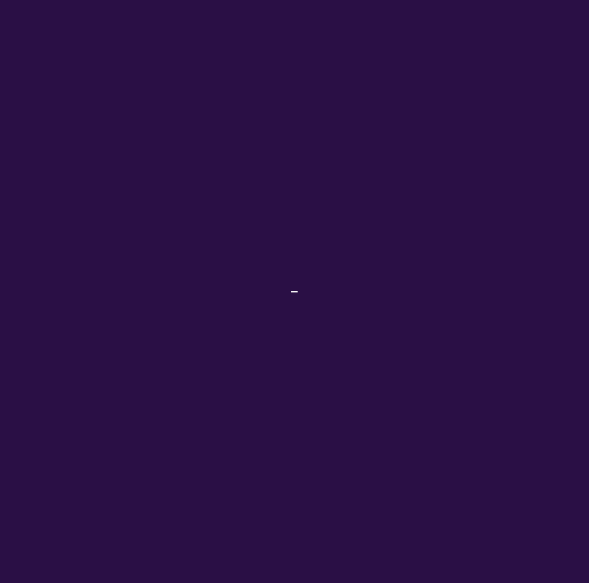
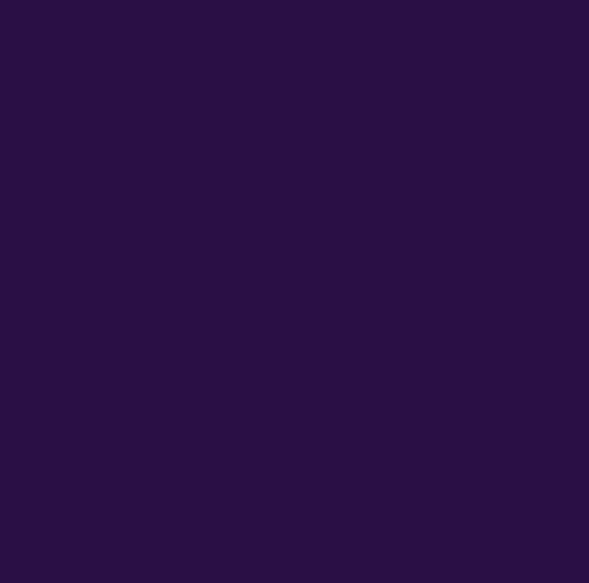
drawing: [291, 291, 298, 293] -> none

